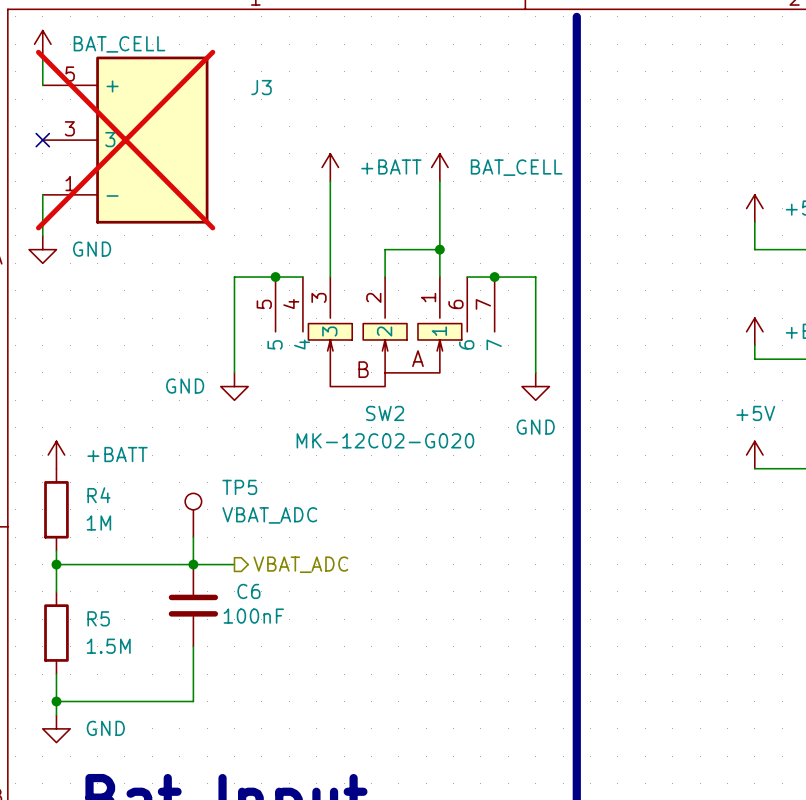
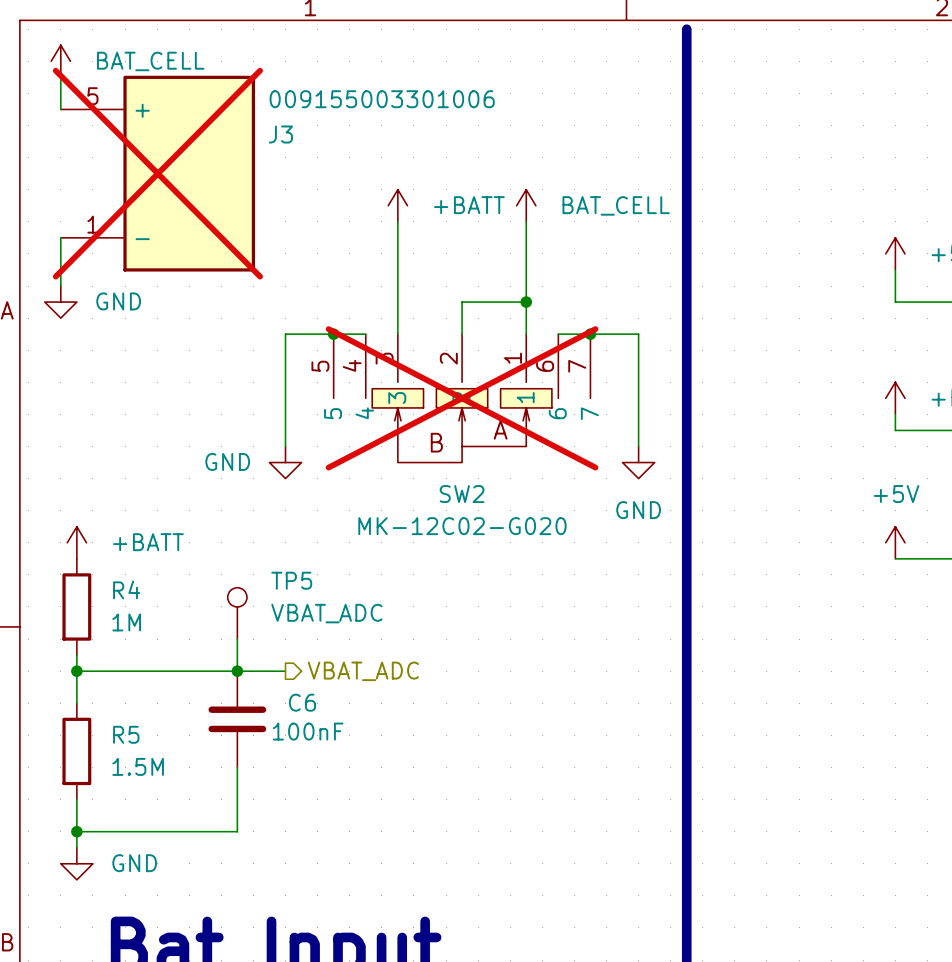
J3 symbol: [42, 56, 209, 224] -> [60, 75, 256, 272]
J3 value: none -> 009155003301006 (382, 99)
J3 name position: J3 (261, 87) -> J3 (280, 134)
no-connect mark: (42, 140) -> none
SW2 do-not-place cross: none -> (462, 398)

